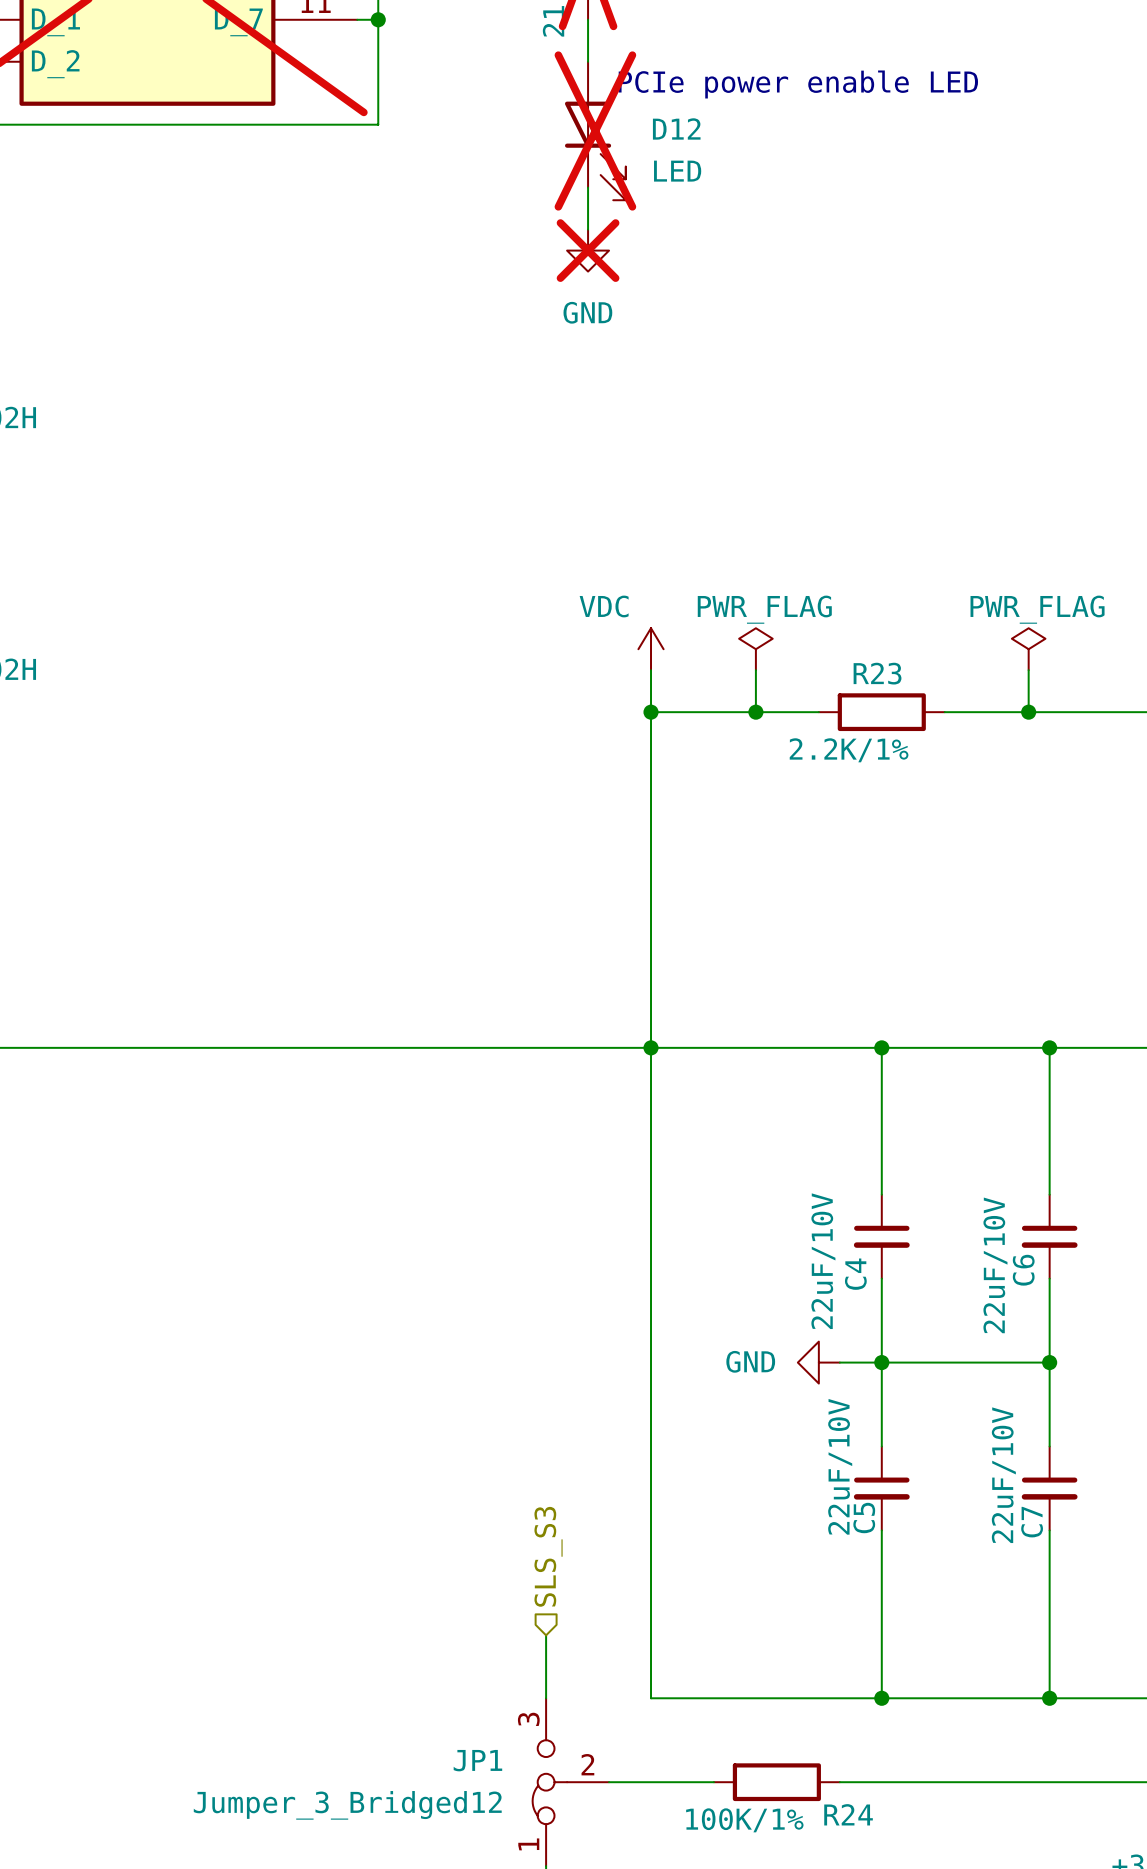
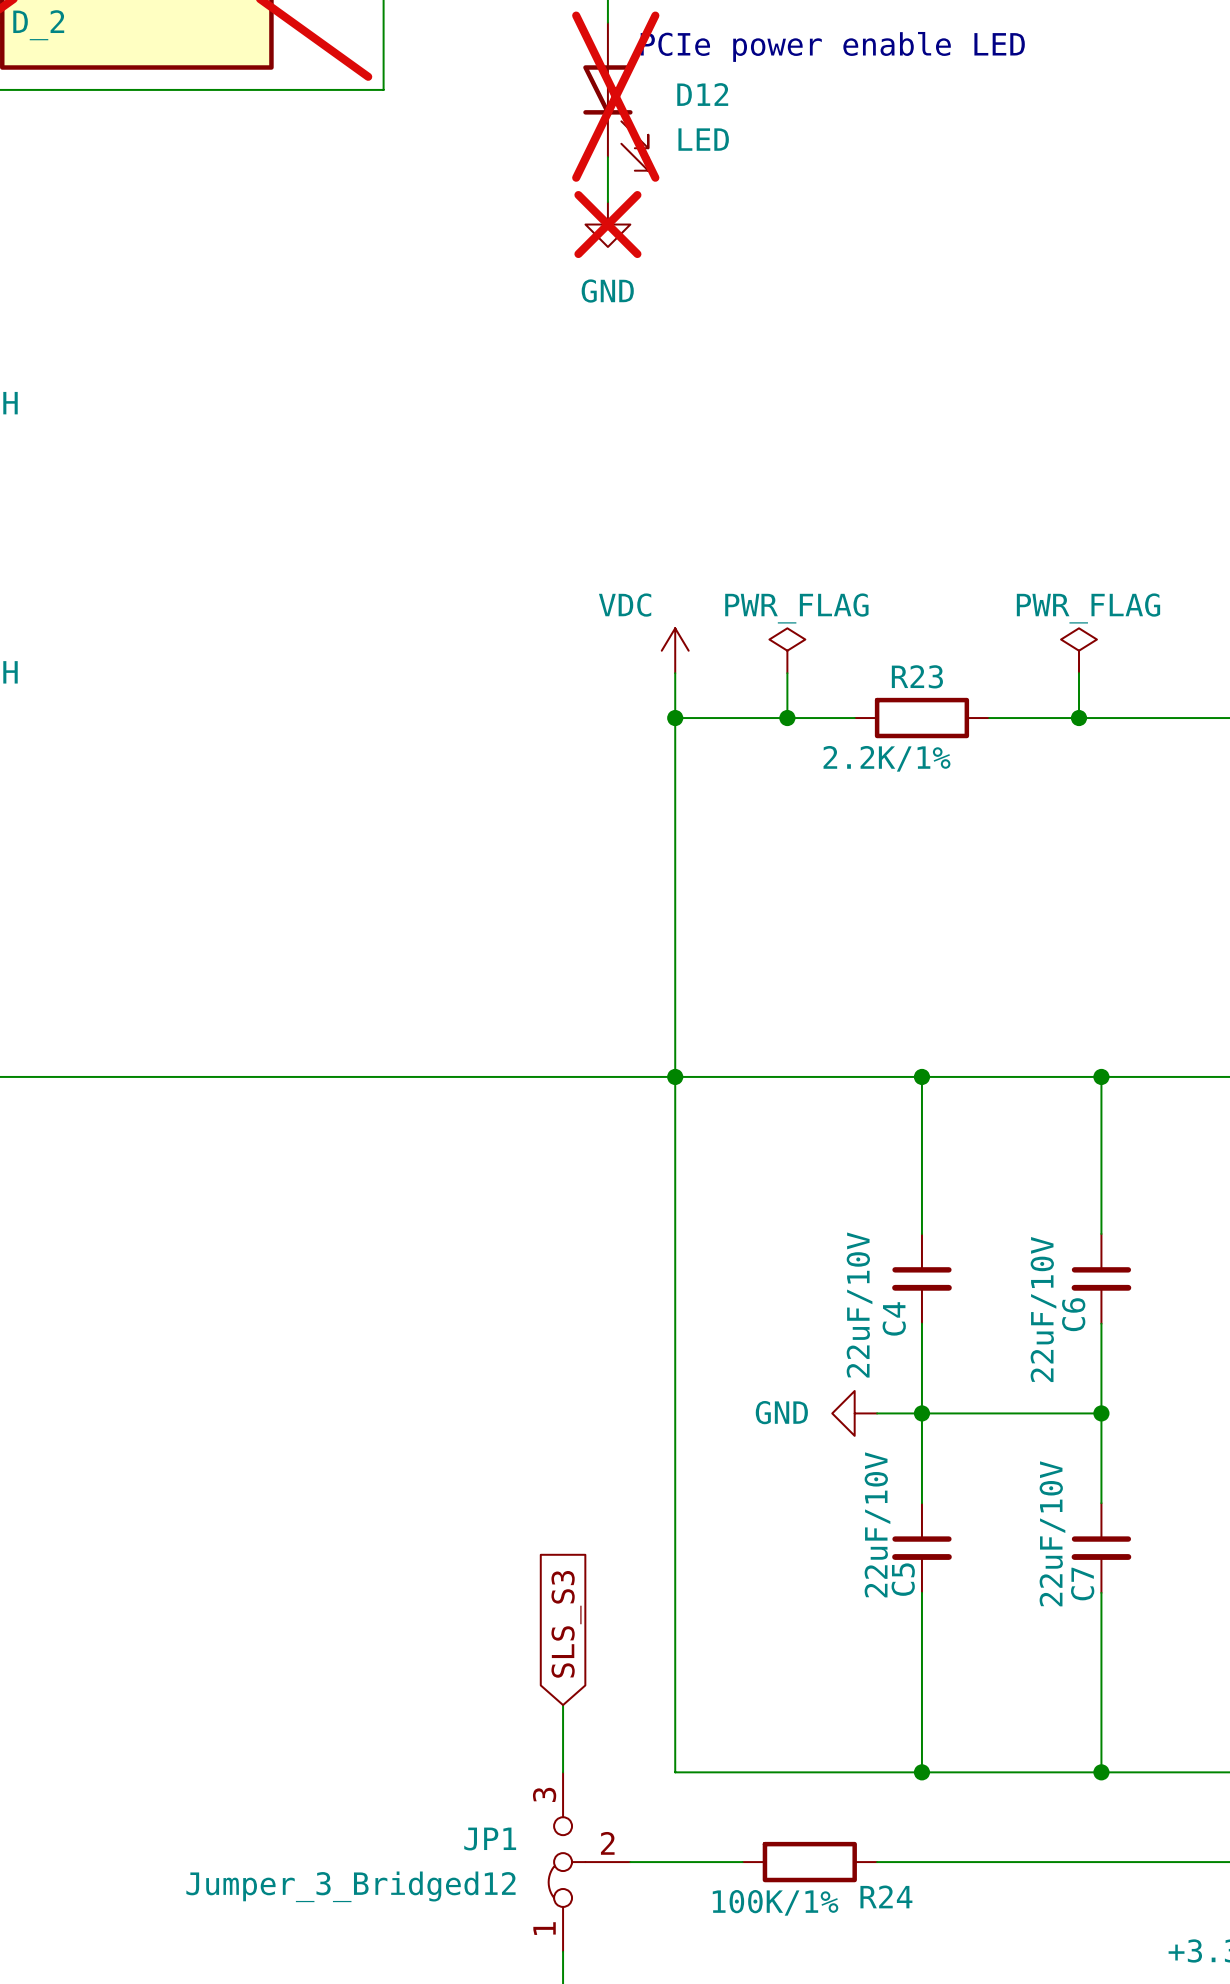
hierarchical label: SLS_S3 (548, 1556) -> none
global label: none -> SLS_S3 (566, 1624)

